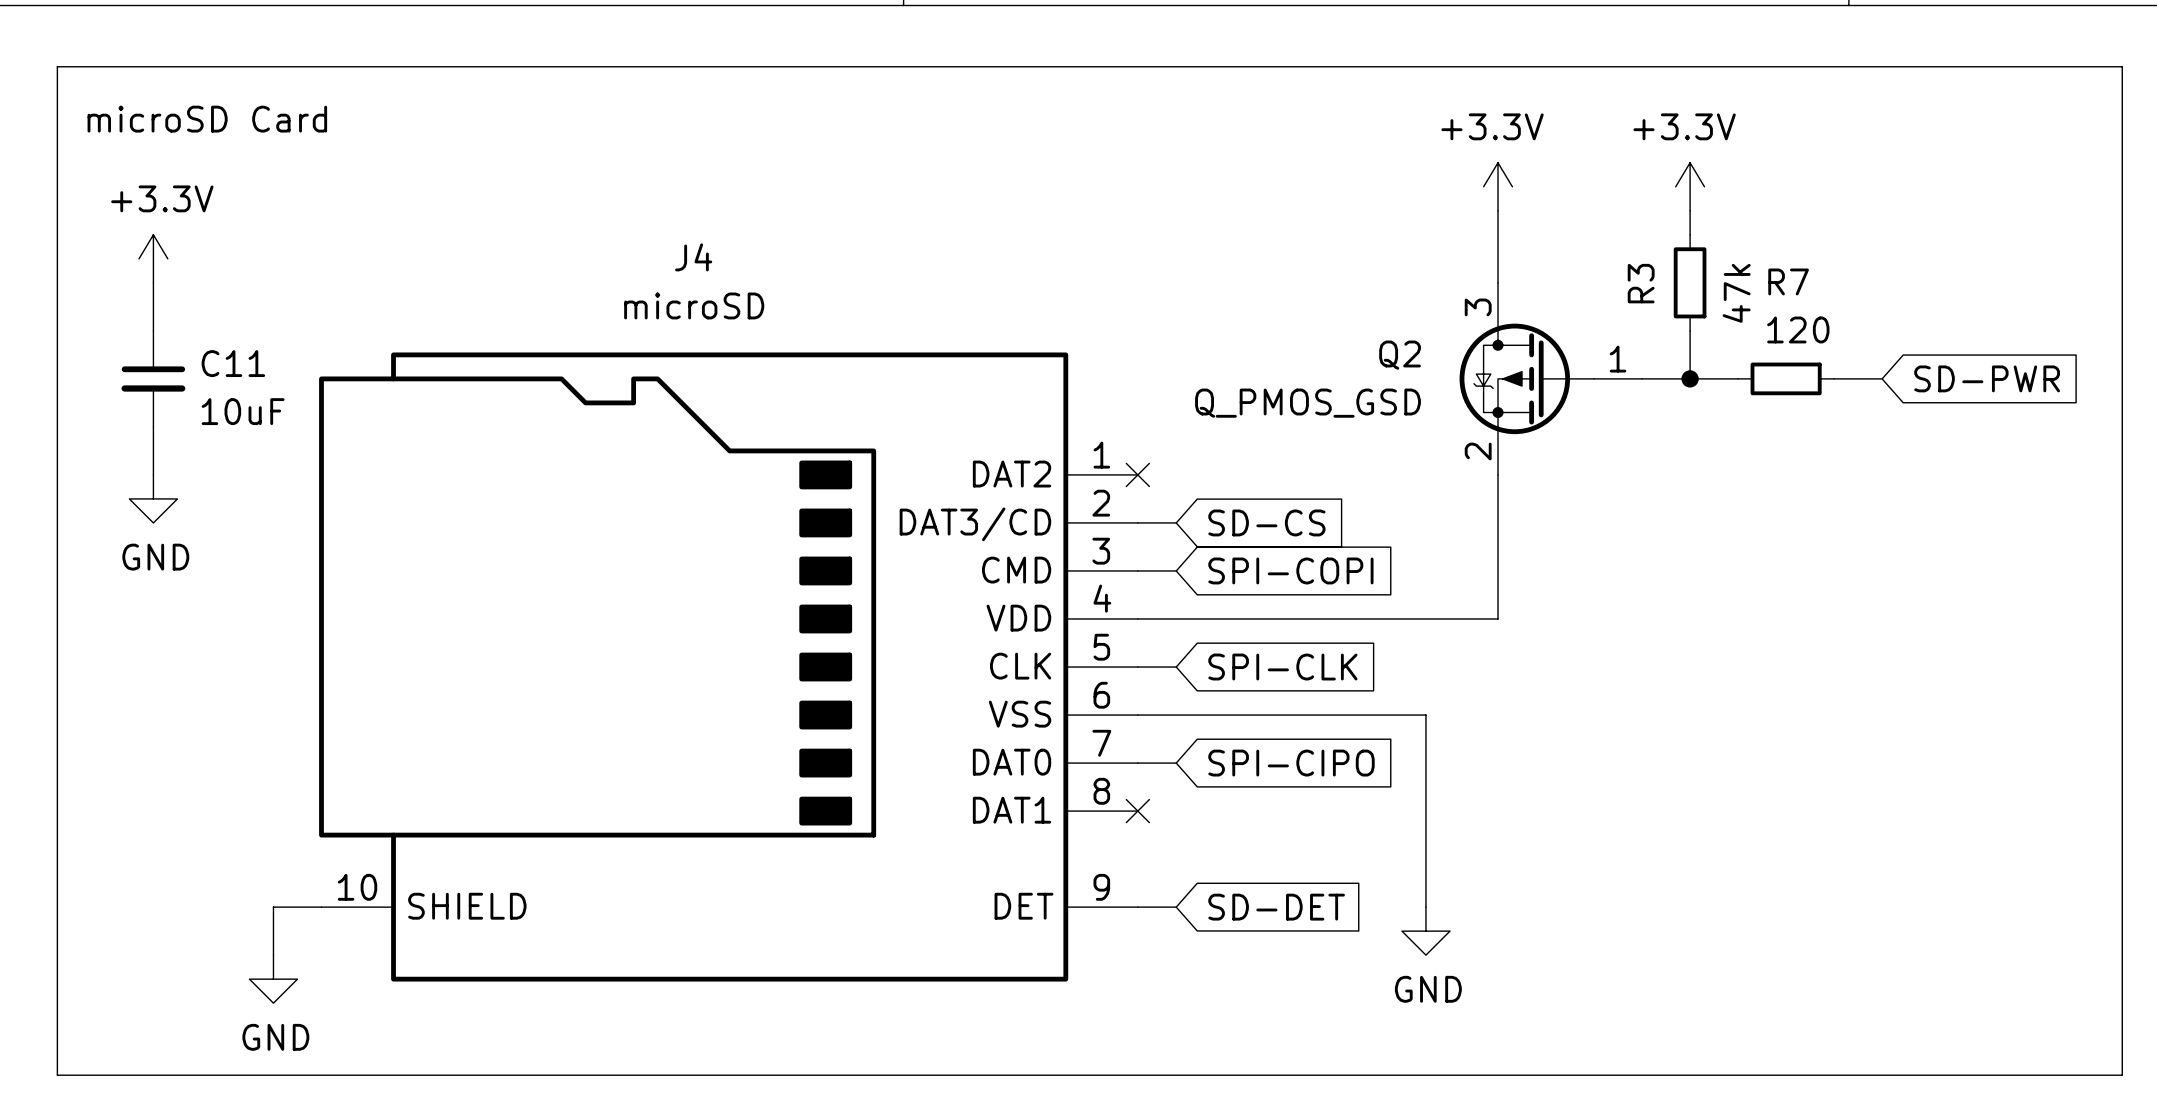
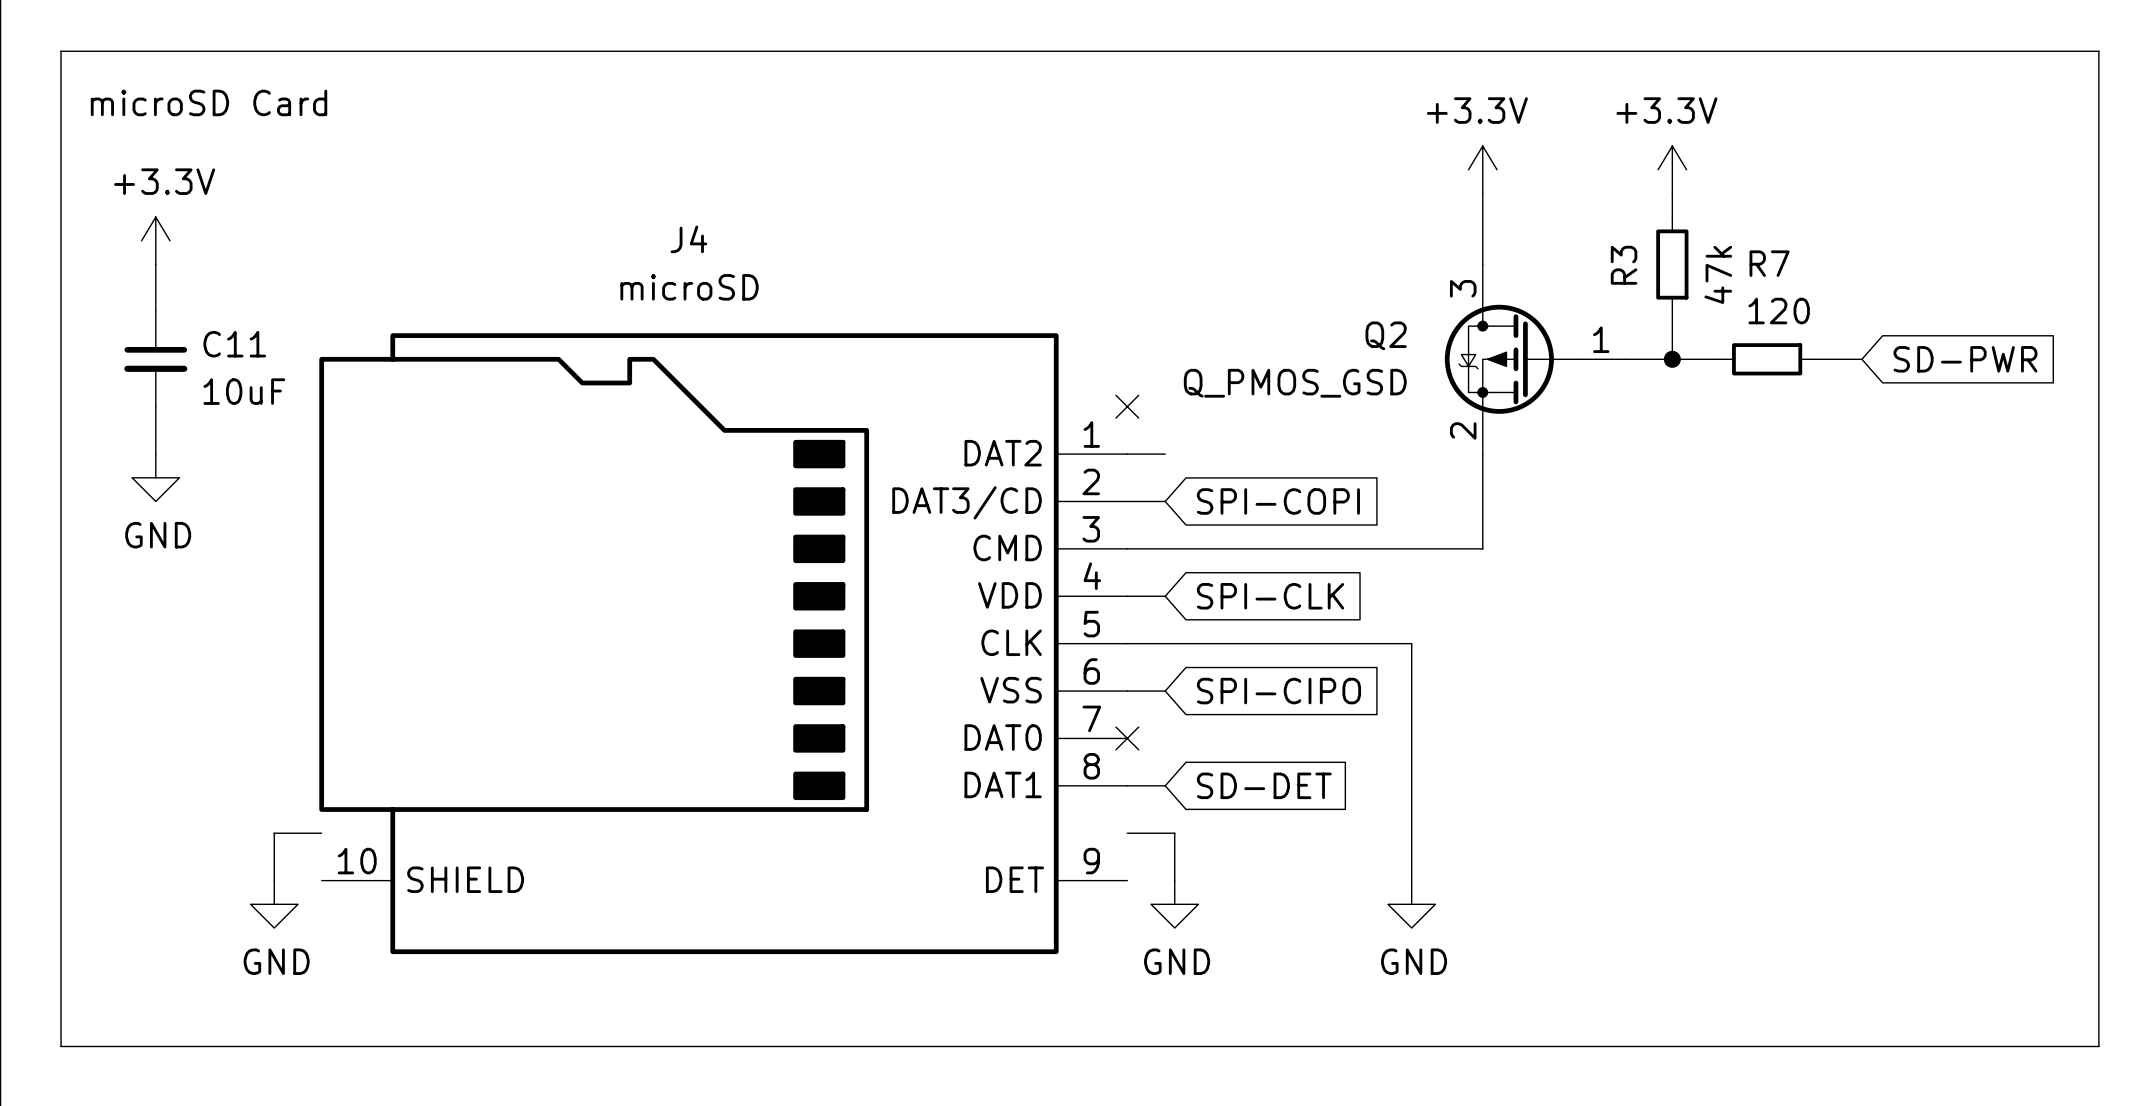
no-connect mark position: (1137, 474) -> (1127, 406)
global label: SD-CS (1266, 522) -> SPI-COPI (1278, 501)
global label: SPI-COPI (1290, 570) -> none
wire: (1498, 570) (1498, 619) (1176, 619) -> (1482, 548) (1165, 548)
global label position: SPI-CLK (1282, 667) -> SPI-CLK (1270, 596)
wire: (1176, 715) (1425, 715) -> (1165, 643) (1411, 643) (1411, 691)
wire: (1137, 763) (1176, 763) -> (1127, 785) (1165, 785)
global label position: SPI-CIPO (1291, 763) -> SPI-CIPO (1278, 691)
no-connect mark position: (1137, 811) -> (1127, 738)
wire: none -> (1127, 833) (1174, 833) (1174, 880)
wire: (321, 907) (273, 907) (273, 955) -> (321, 833) (274, 833) (274, 880)
wire: (1137, 907) (1176, 907) -> (1127, 454) (1165, 454)
global label position: SD-DET (1276, 907) -> SD-DET (1264, 785)
power symbol: none -> GND (1174, 904)
power symbol position: GND (273, 979) -> GND (274, 904)

